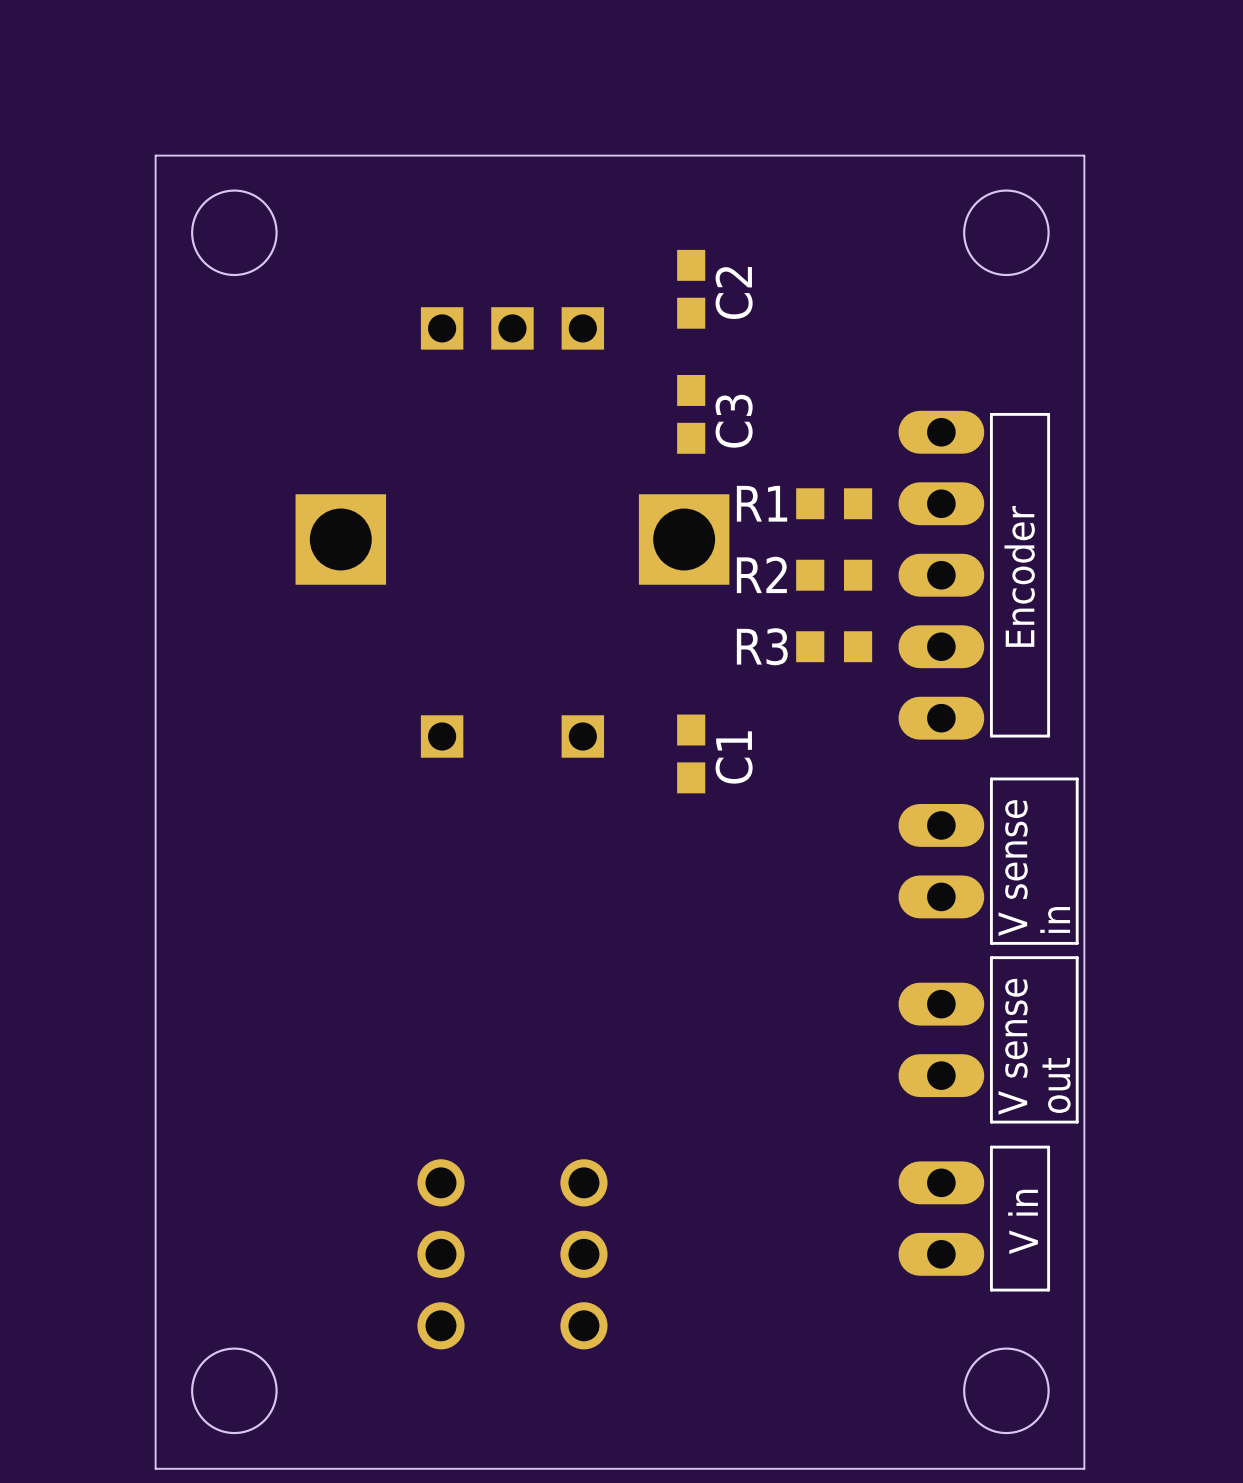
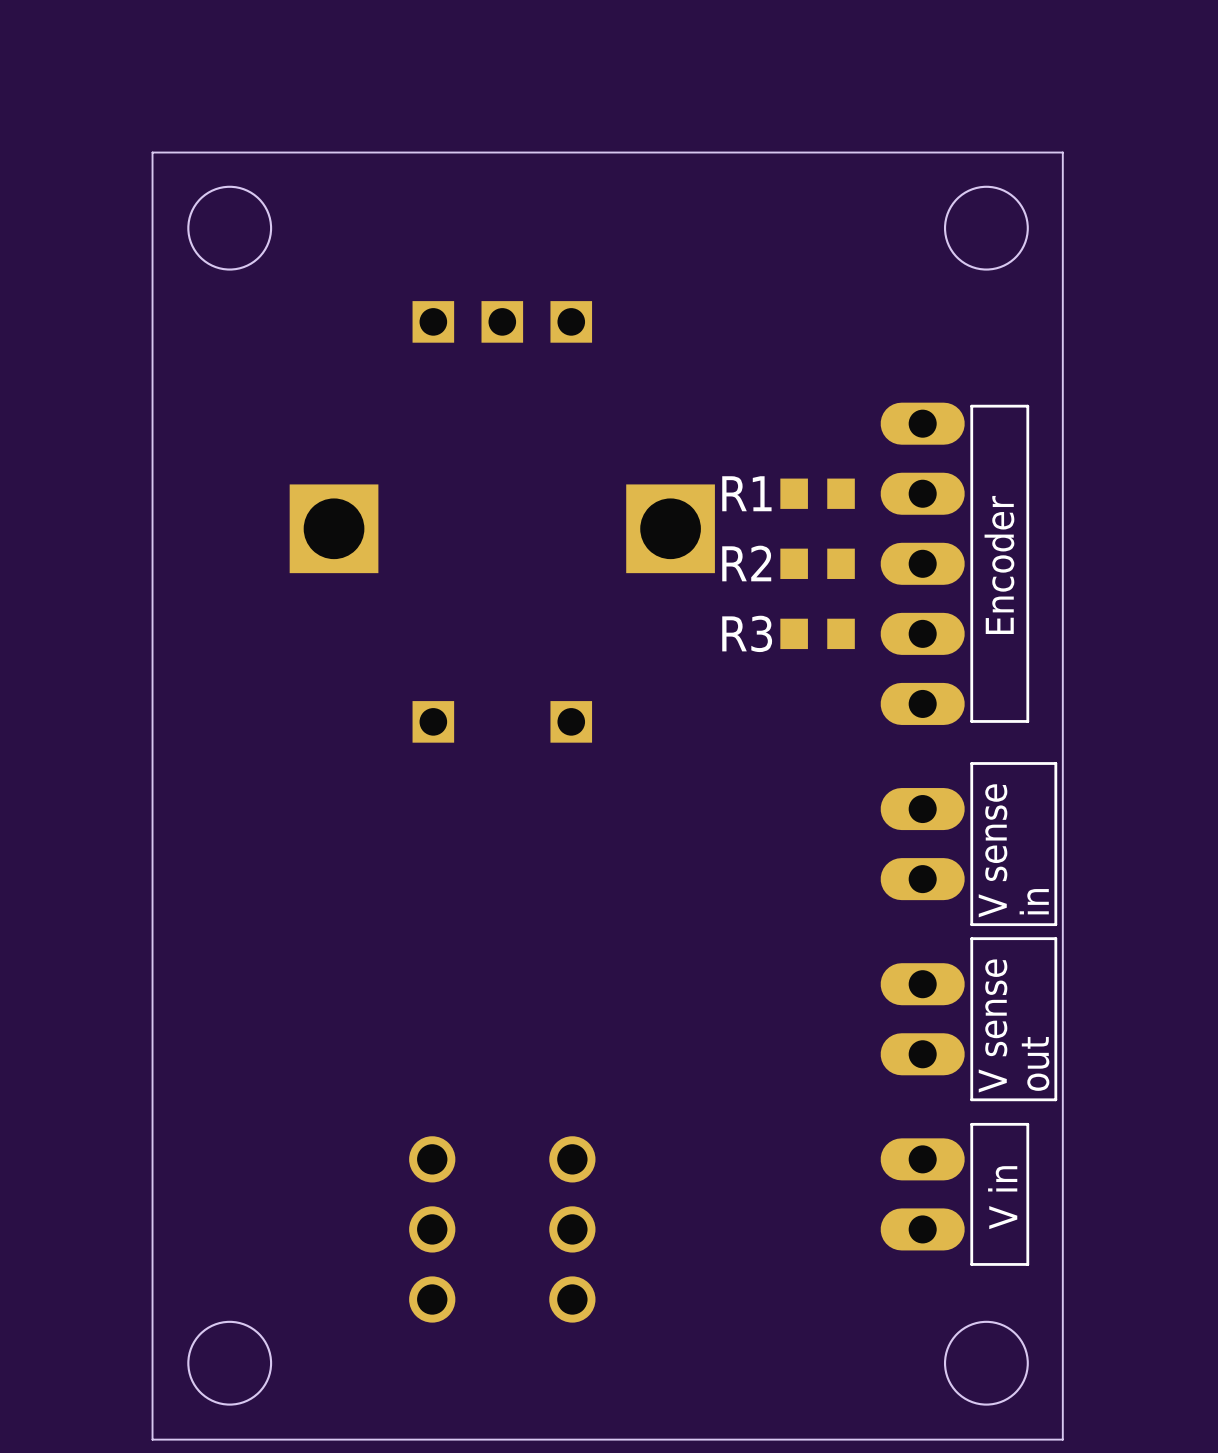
C2: (691, 289) -> none
C3: (691, 414) -> none
C1: (691, 753) -> none

